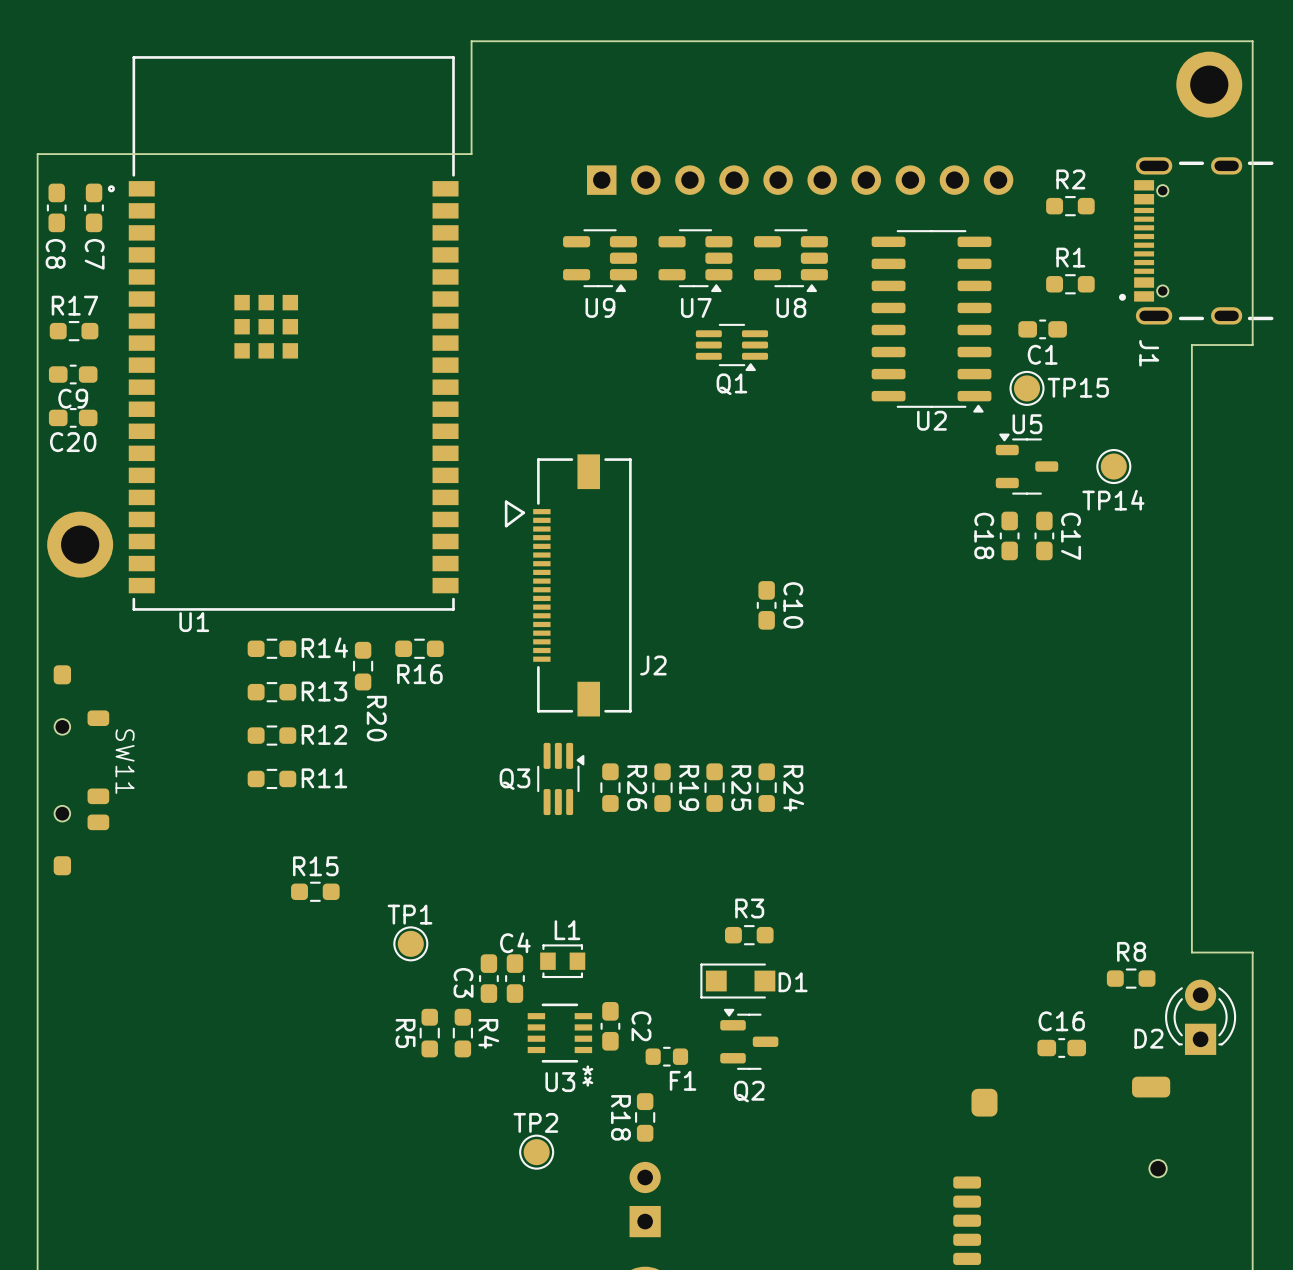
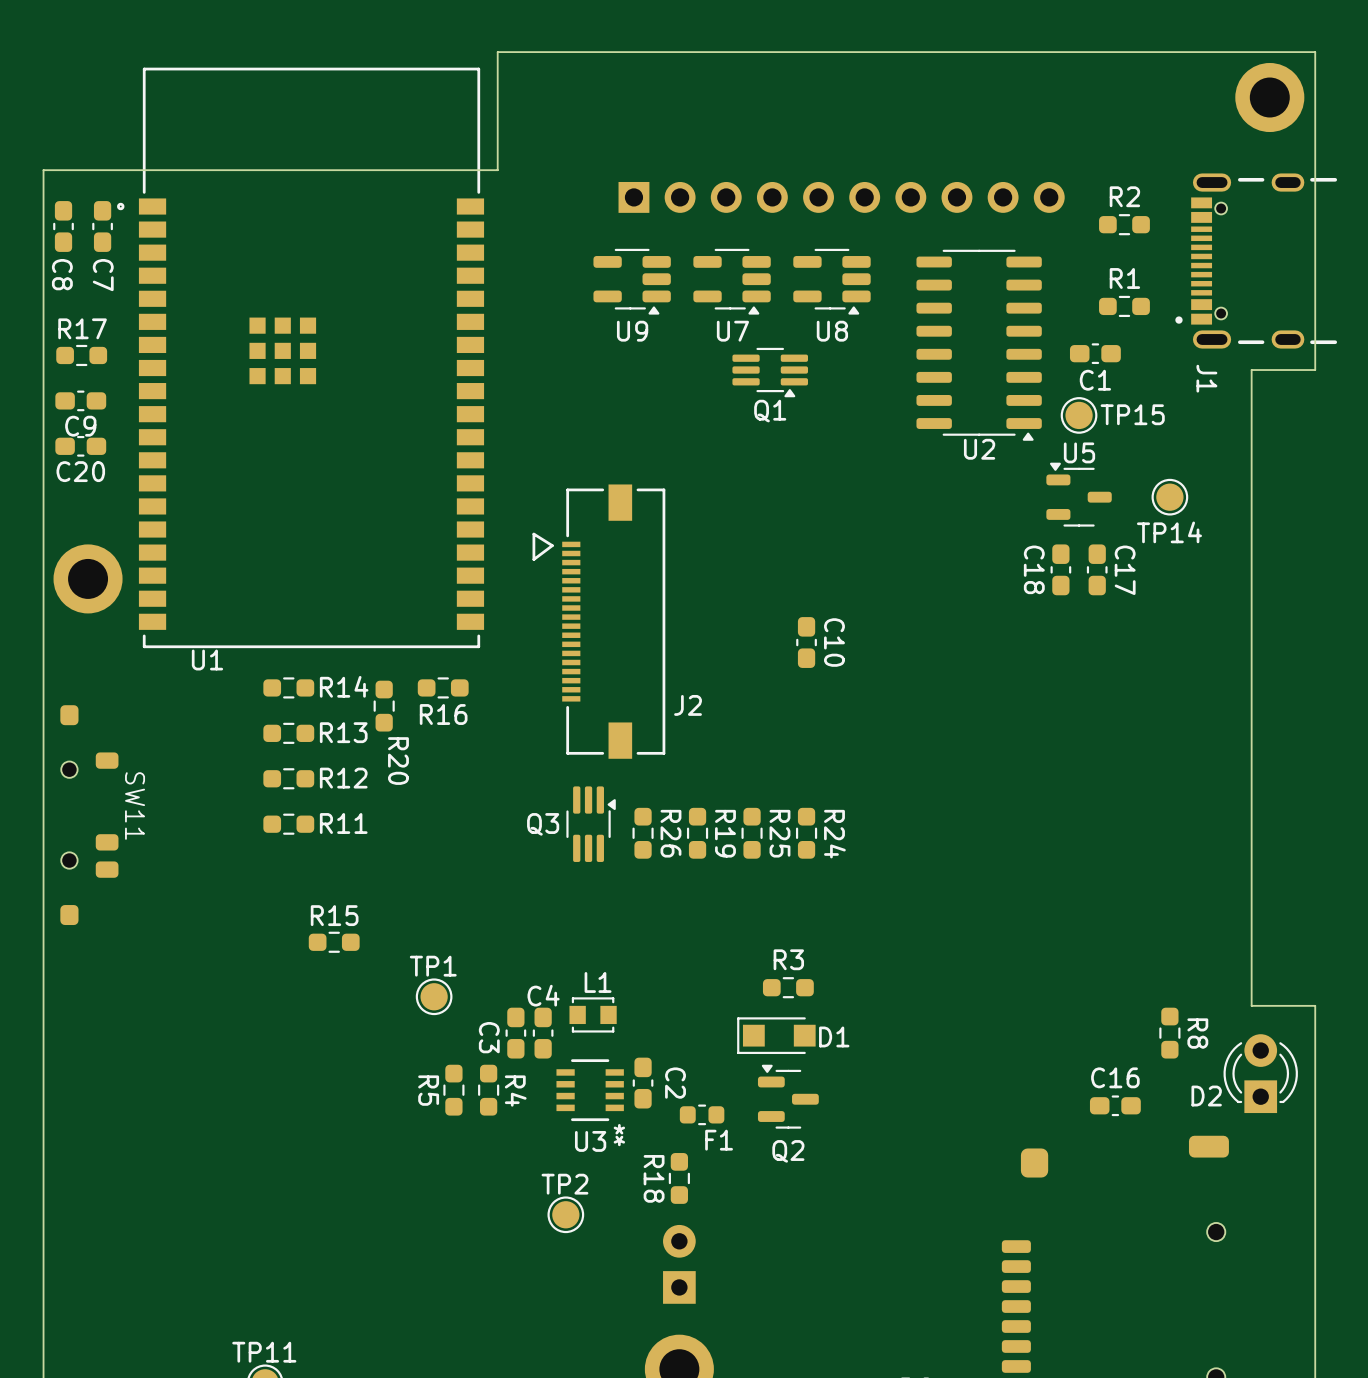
R8 rotation: 0° (1131, 978) -> 90° clockwise (1169, 1033)

